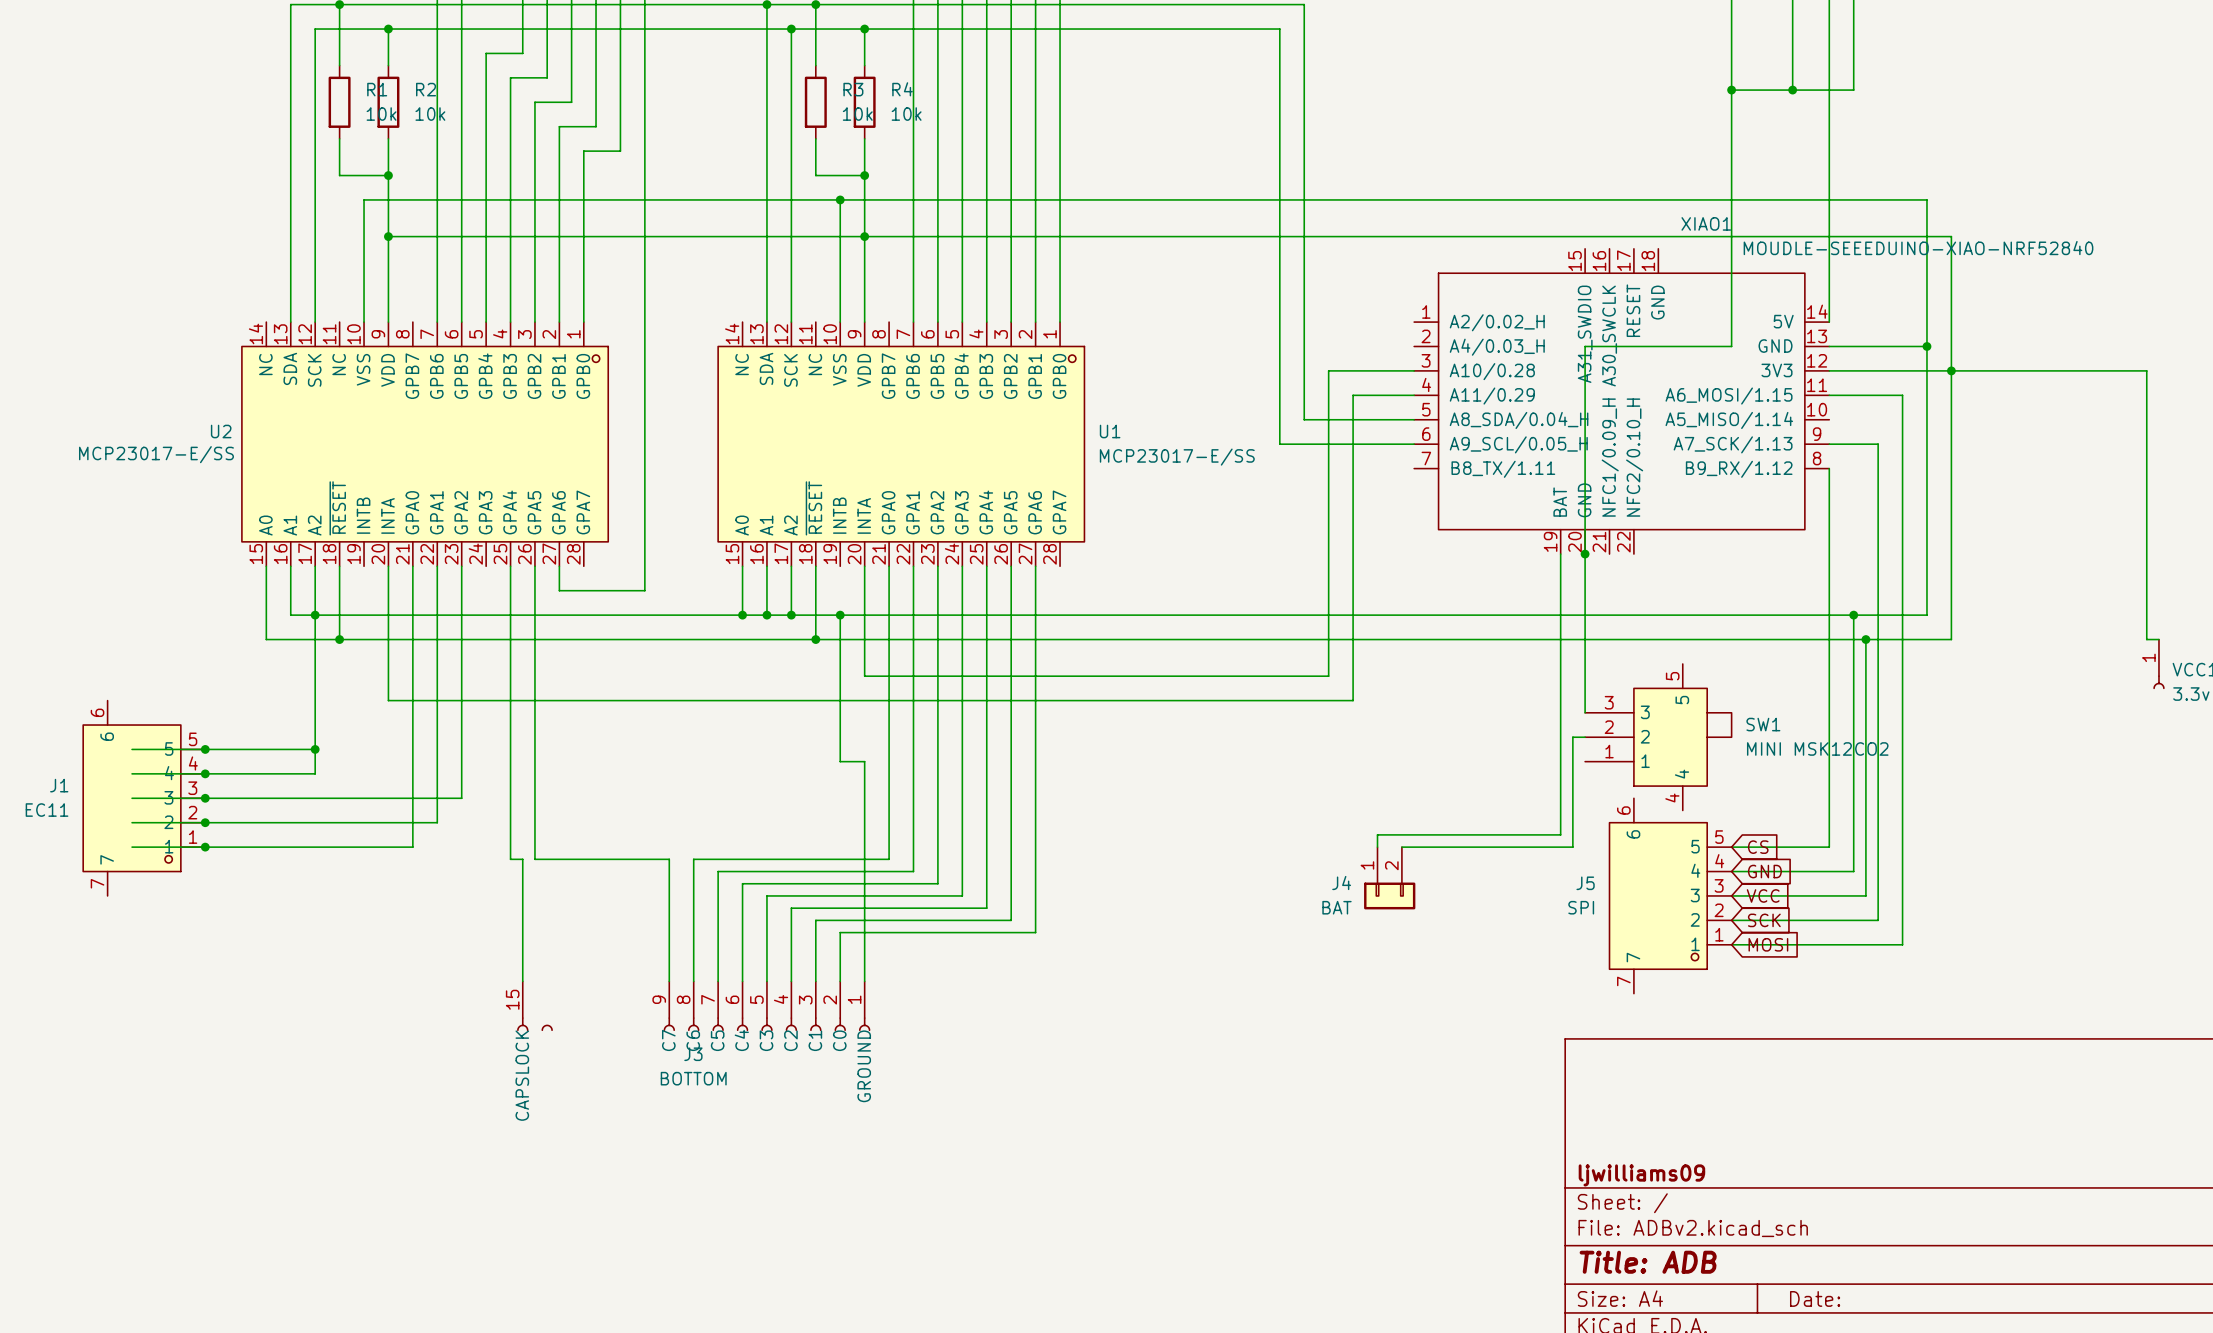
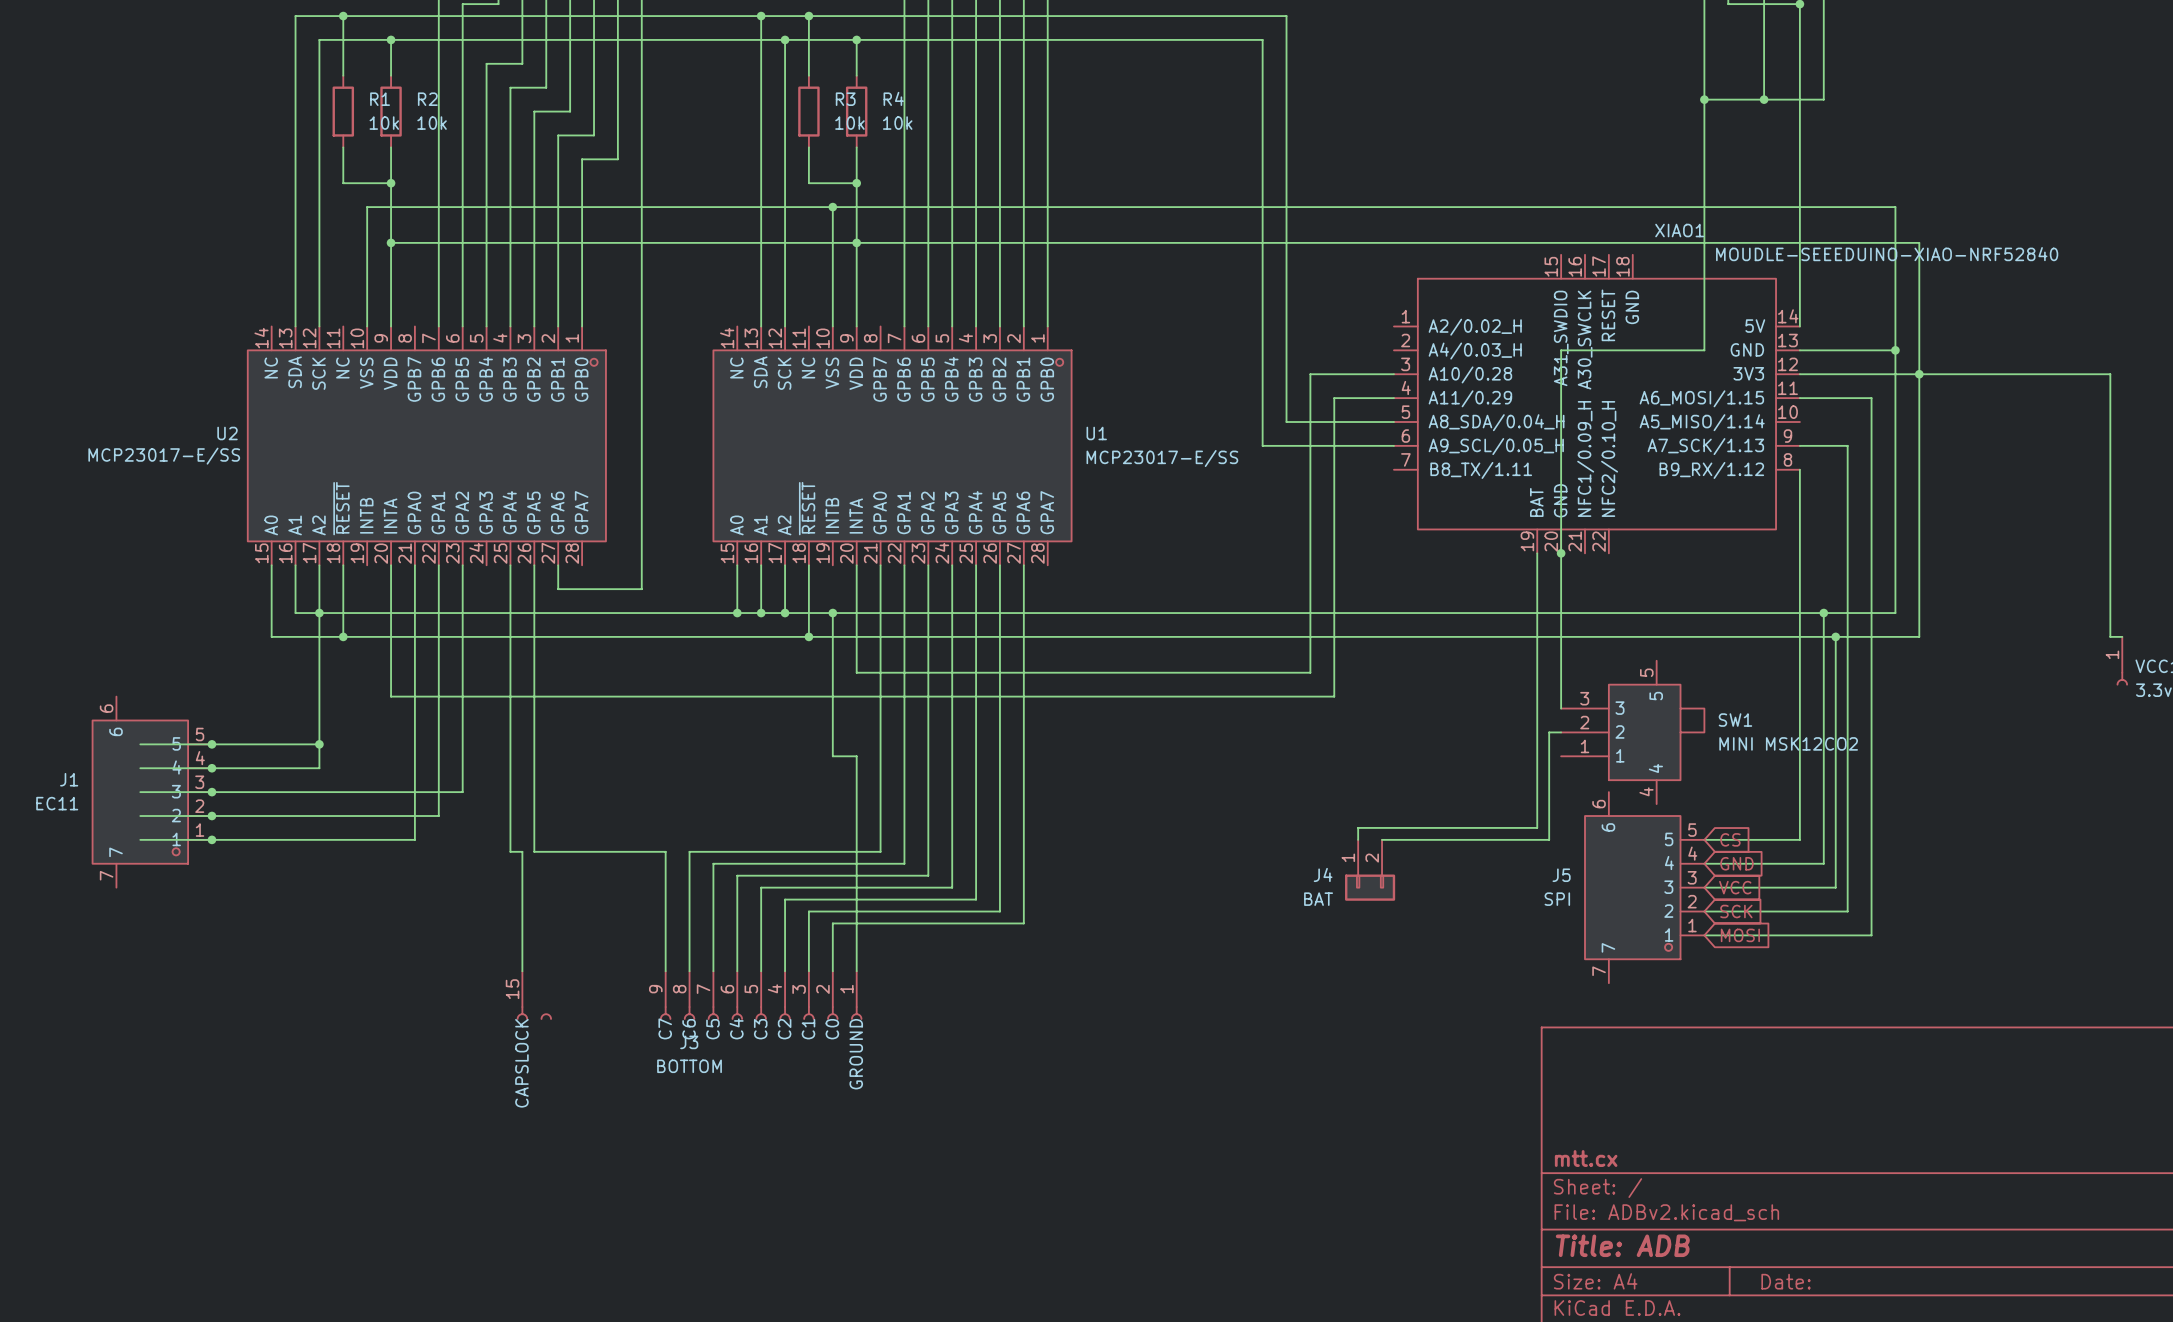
title block: ljwilliams09 (1641, 1175) -> mtt.cx (1586, 1158)

